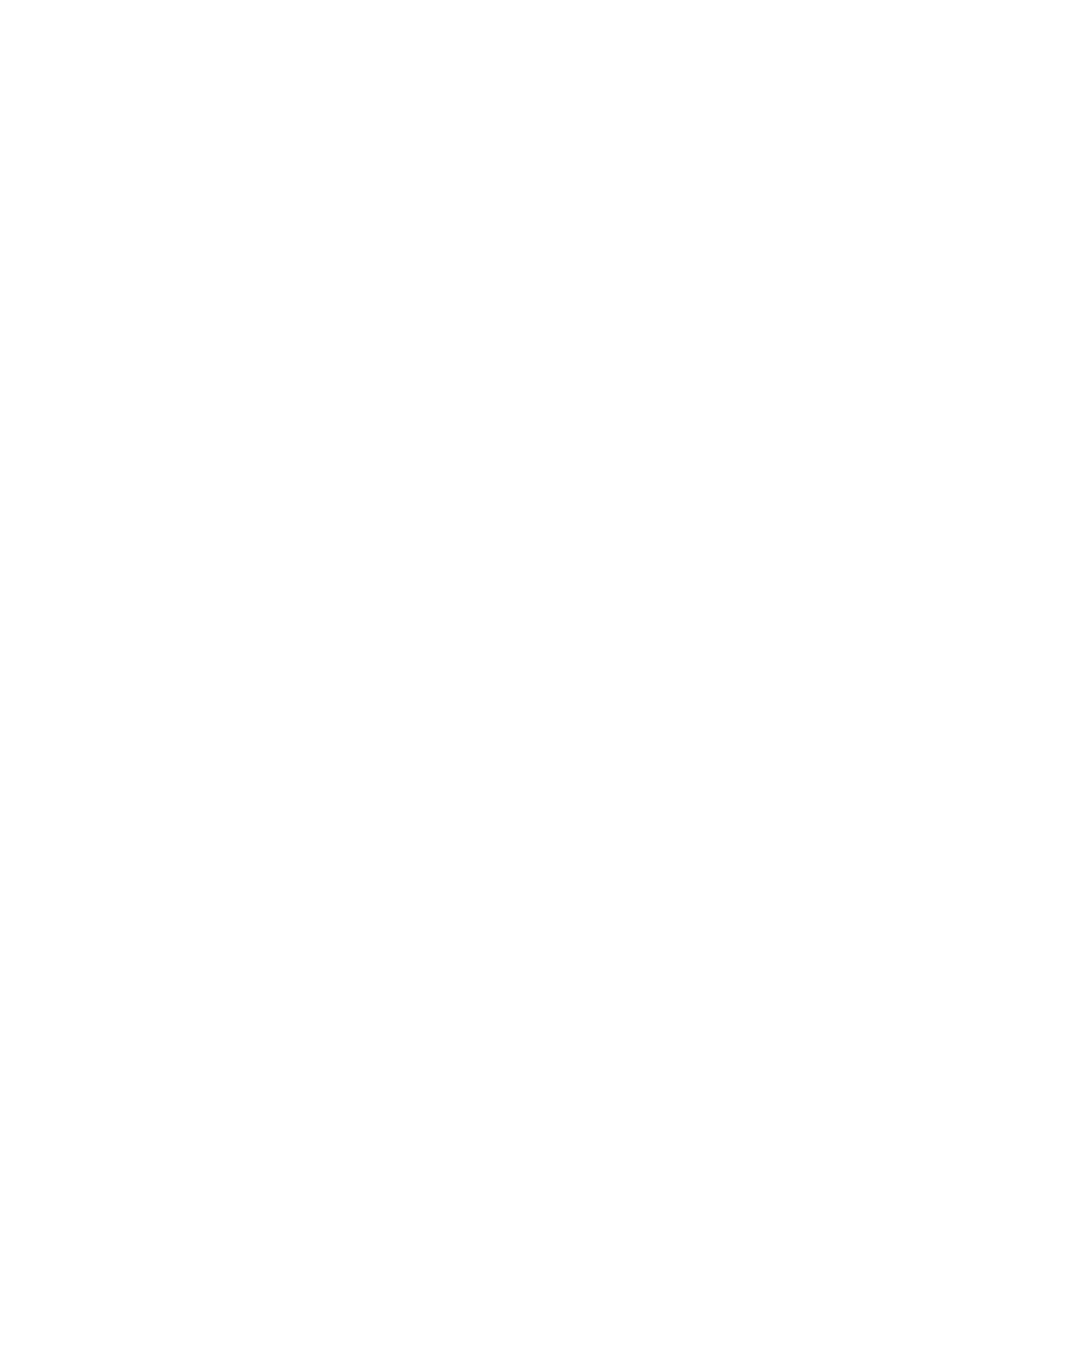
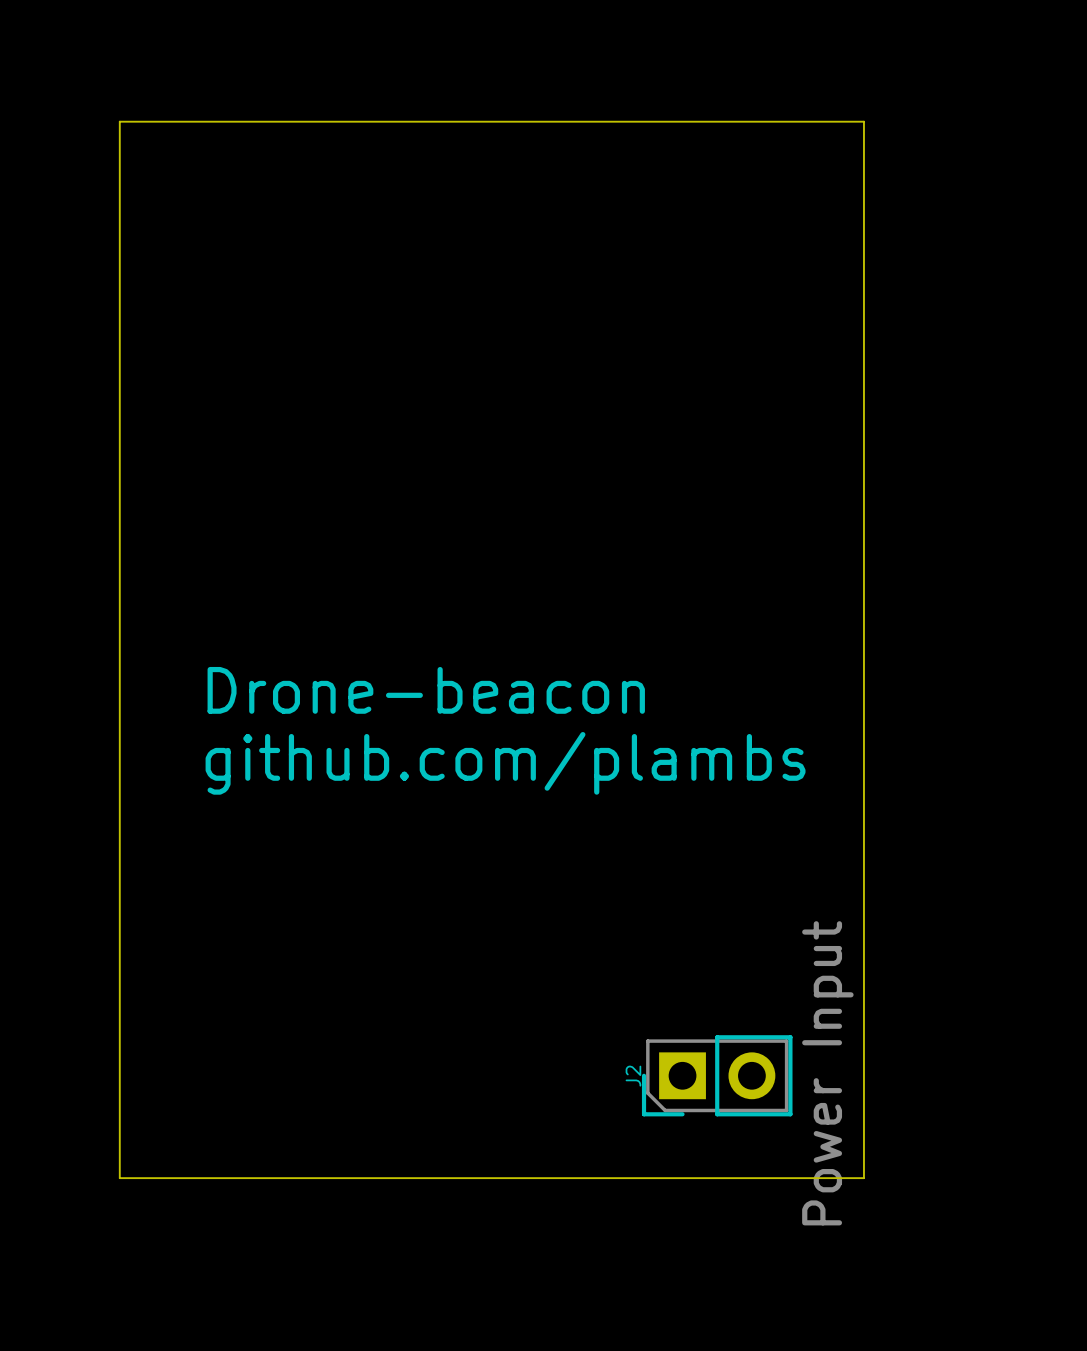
board edge: none -> (119, 121) (863, 121) (863, 1178) (119, 1178) (119, 121)
text: none -> Drone-beacon (426, 690)
text: none -> github.com/plambs (505, 763)
J2: none -> Power Input (717, 1075)

